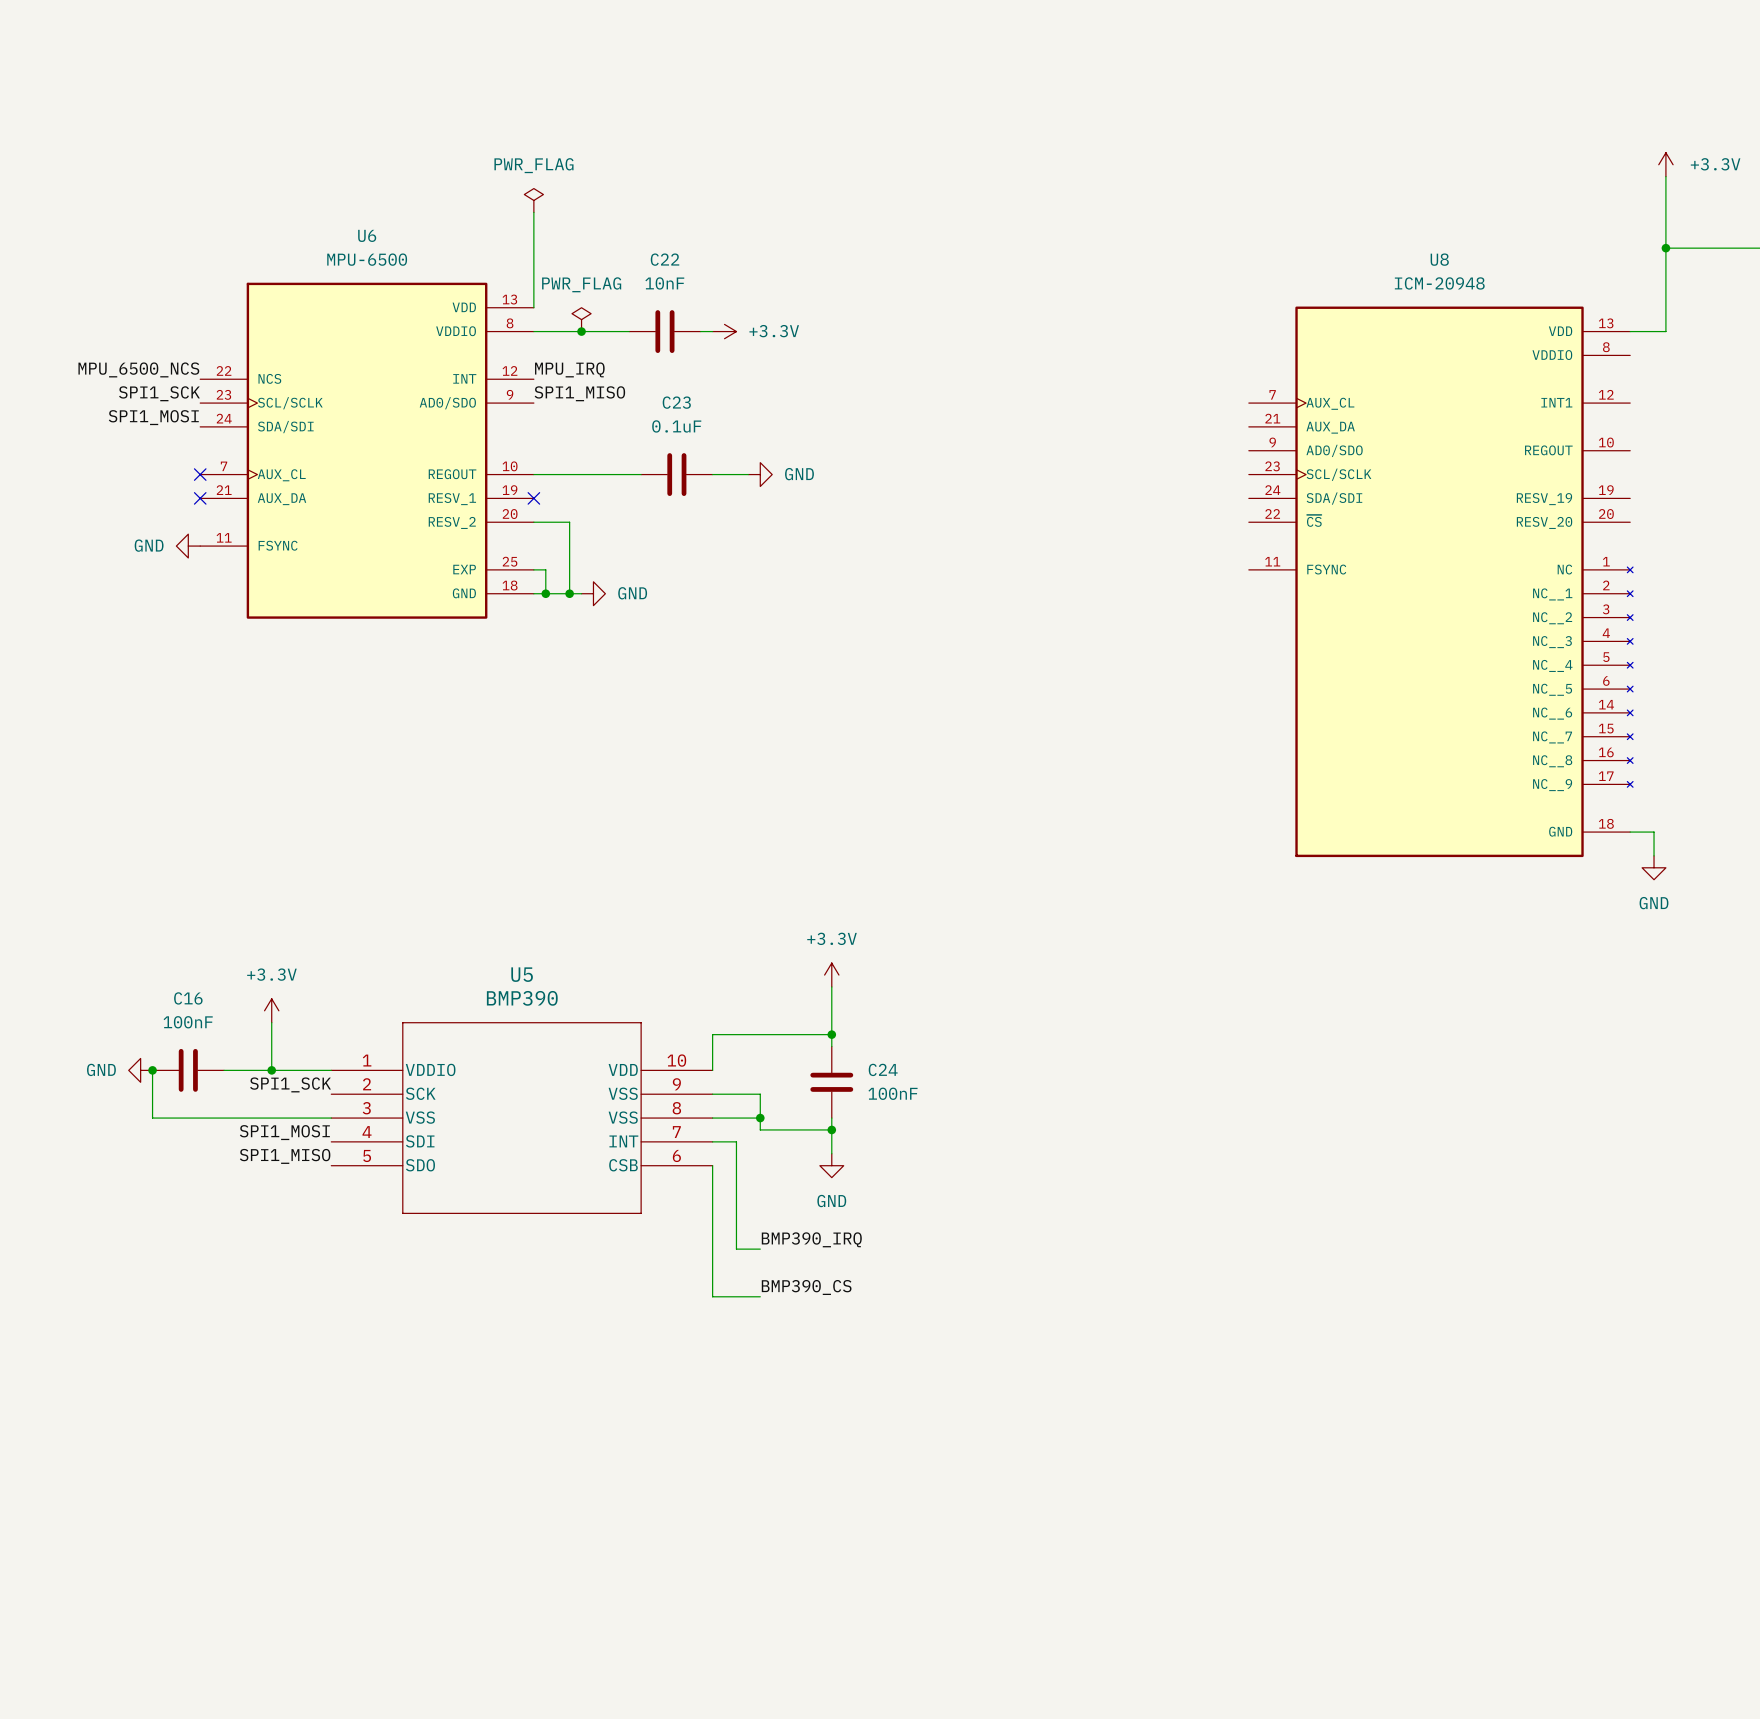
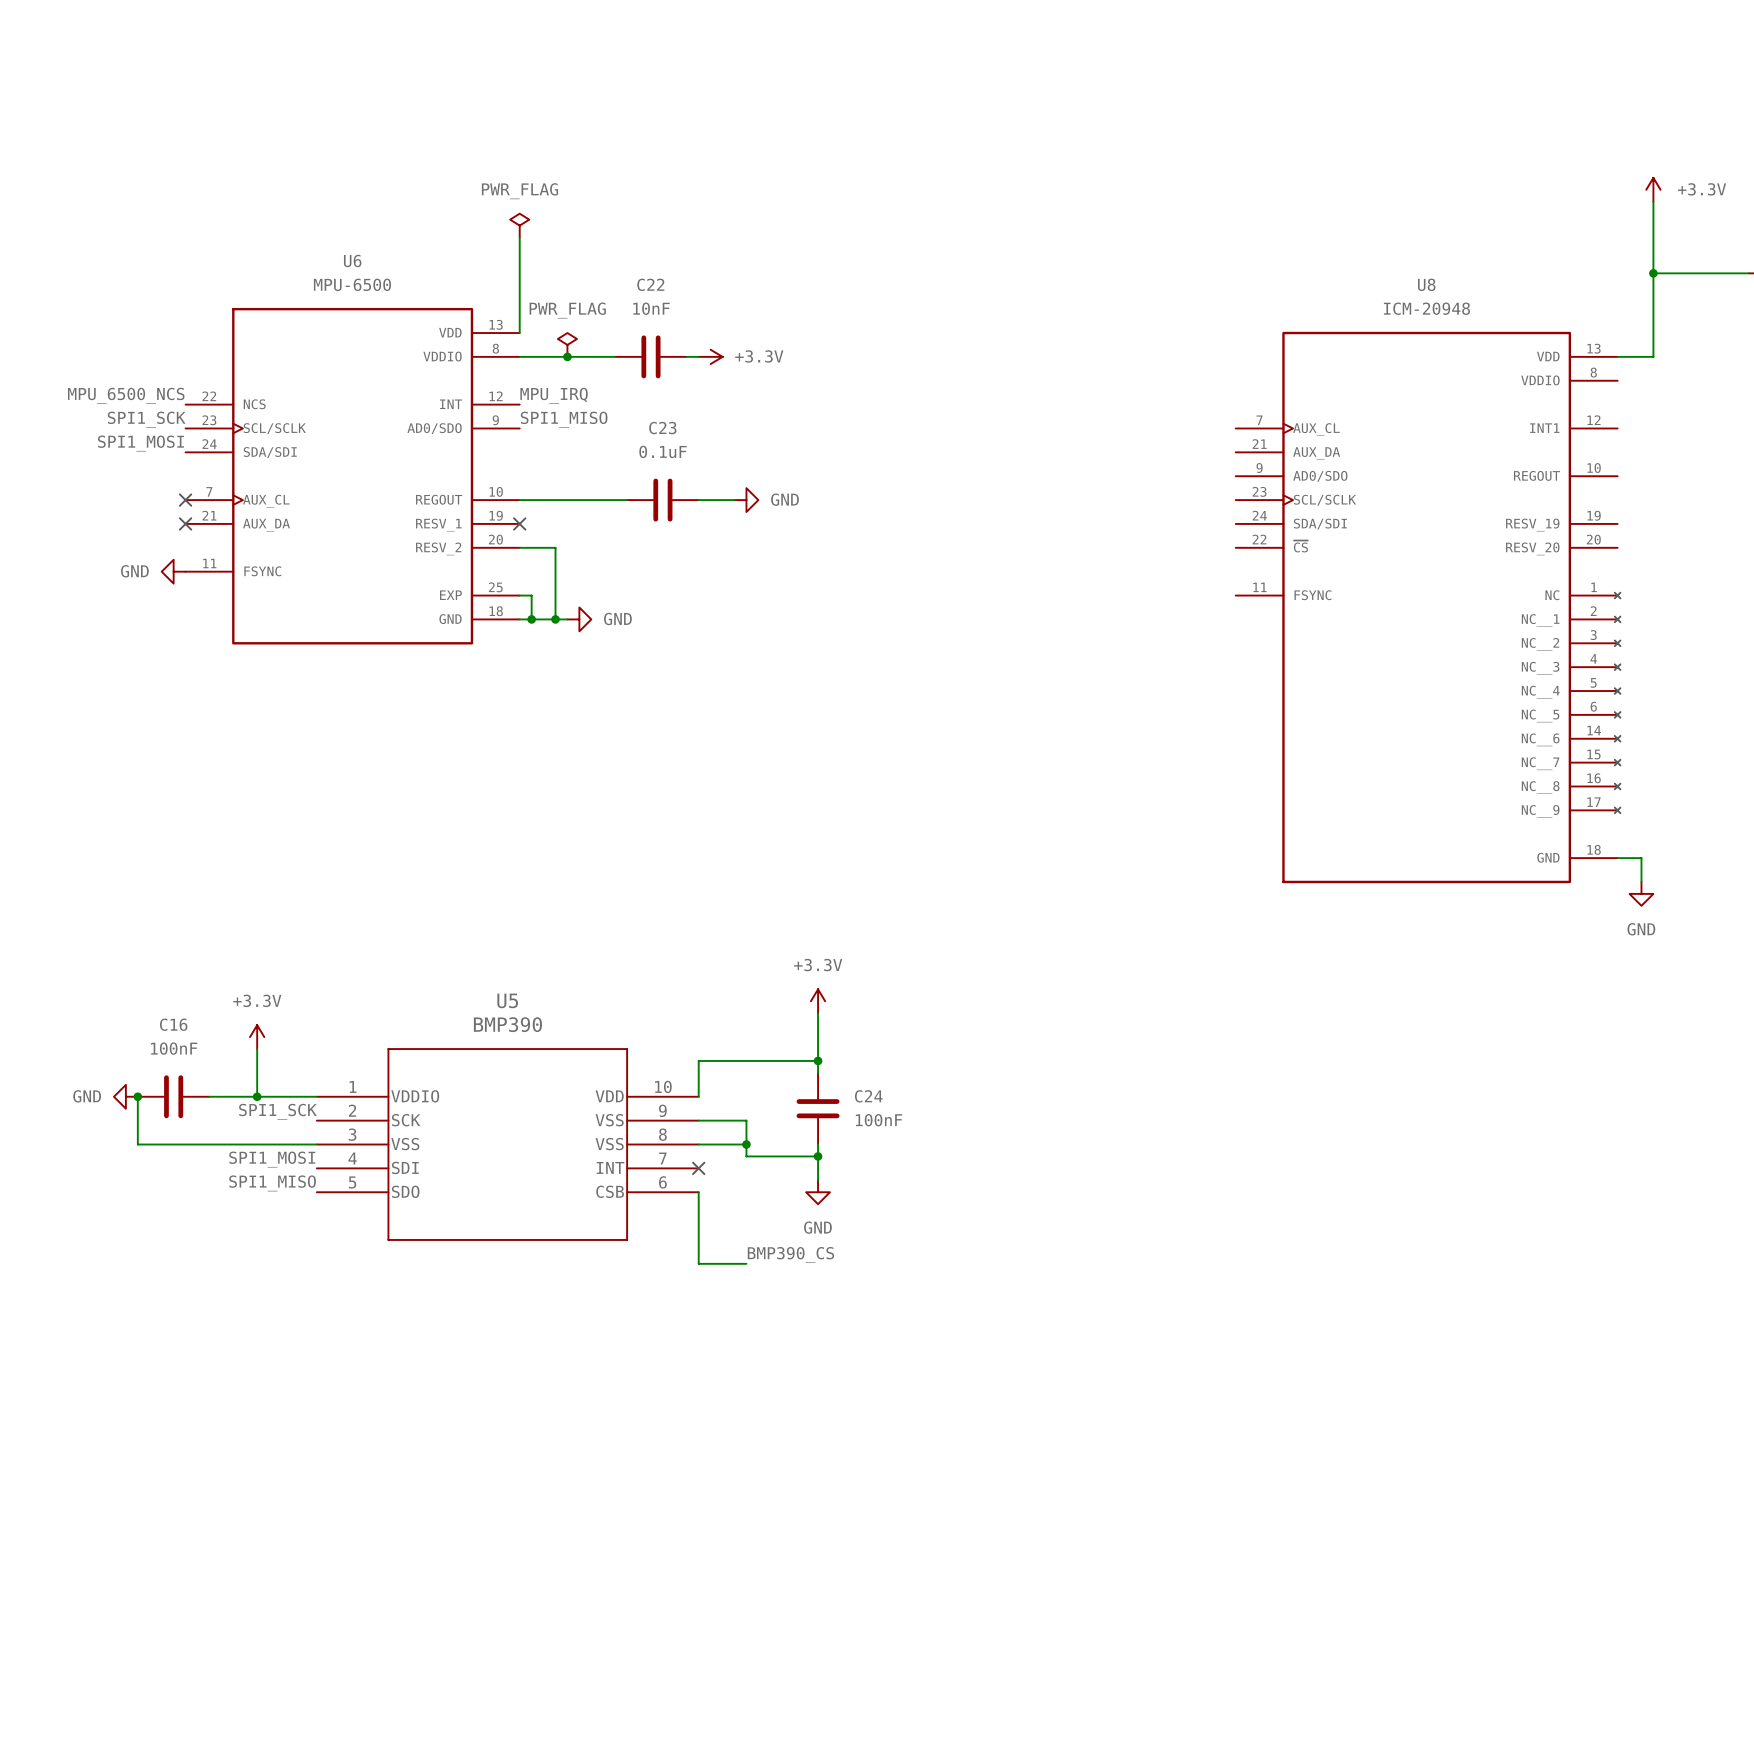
wire: (712, 1141) (736, 1141) (736, 1249) (760, 1249) -> none
no-connect mark: none -> (698, 1168)
wire: (712, 1237) (712, 1296) (760, 1296) -> (698, 1263) (746, 1263)
label: BMP390_IRQ (811, 1239) -> none
label position: BMP390_CS (806, 1287) -> BMP390_CS (790, 1255)

